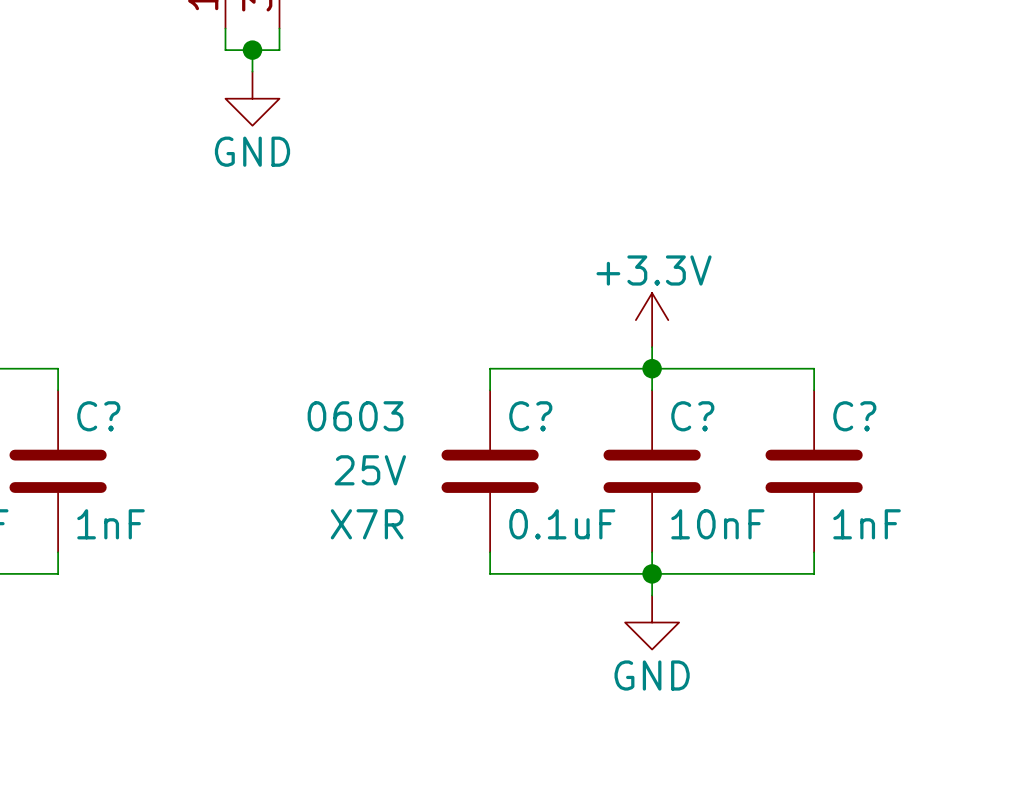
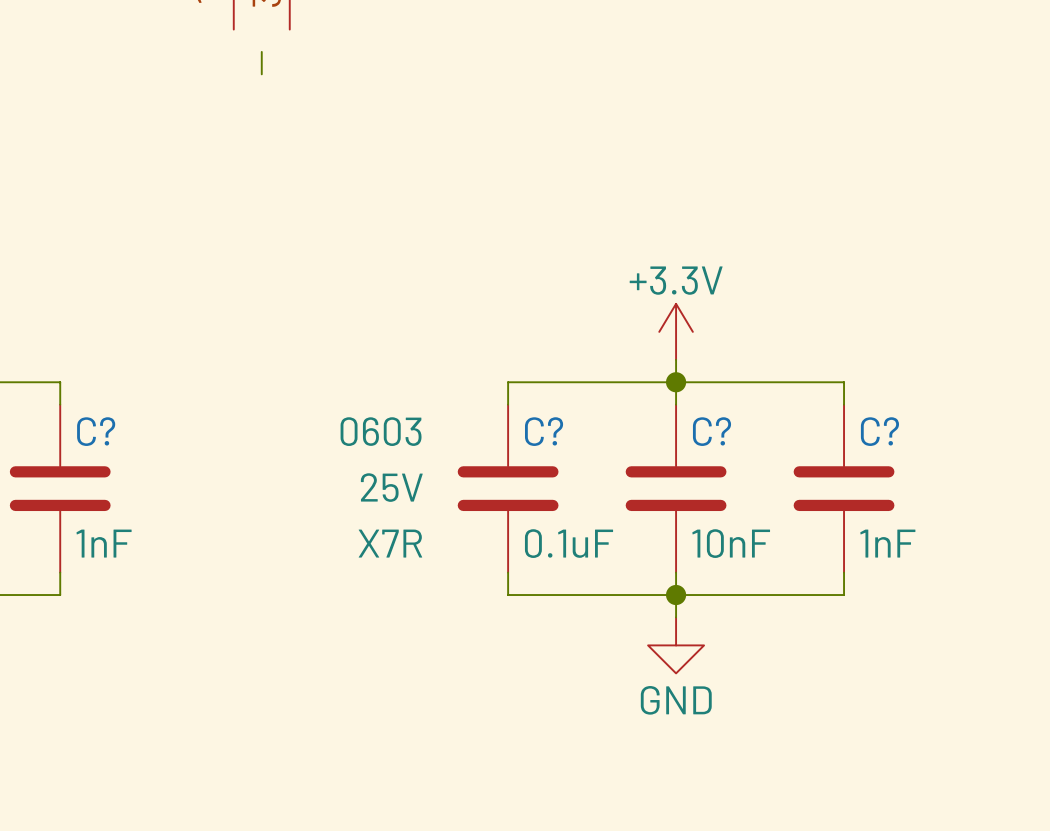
wire: (225, 28) (225, 50) (279, 50) (279, 28) -> none
junction: (252, 50) -> none
power symbol: GND (252, 98) -> none

